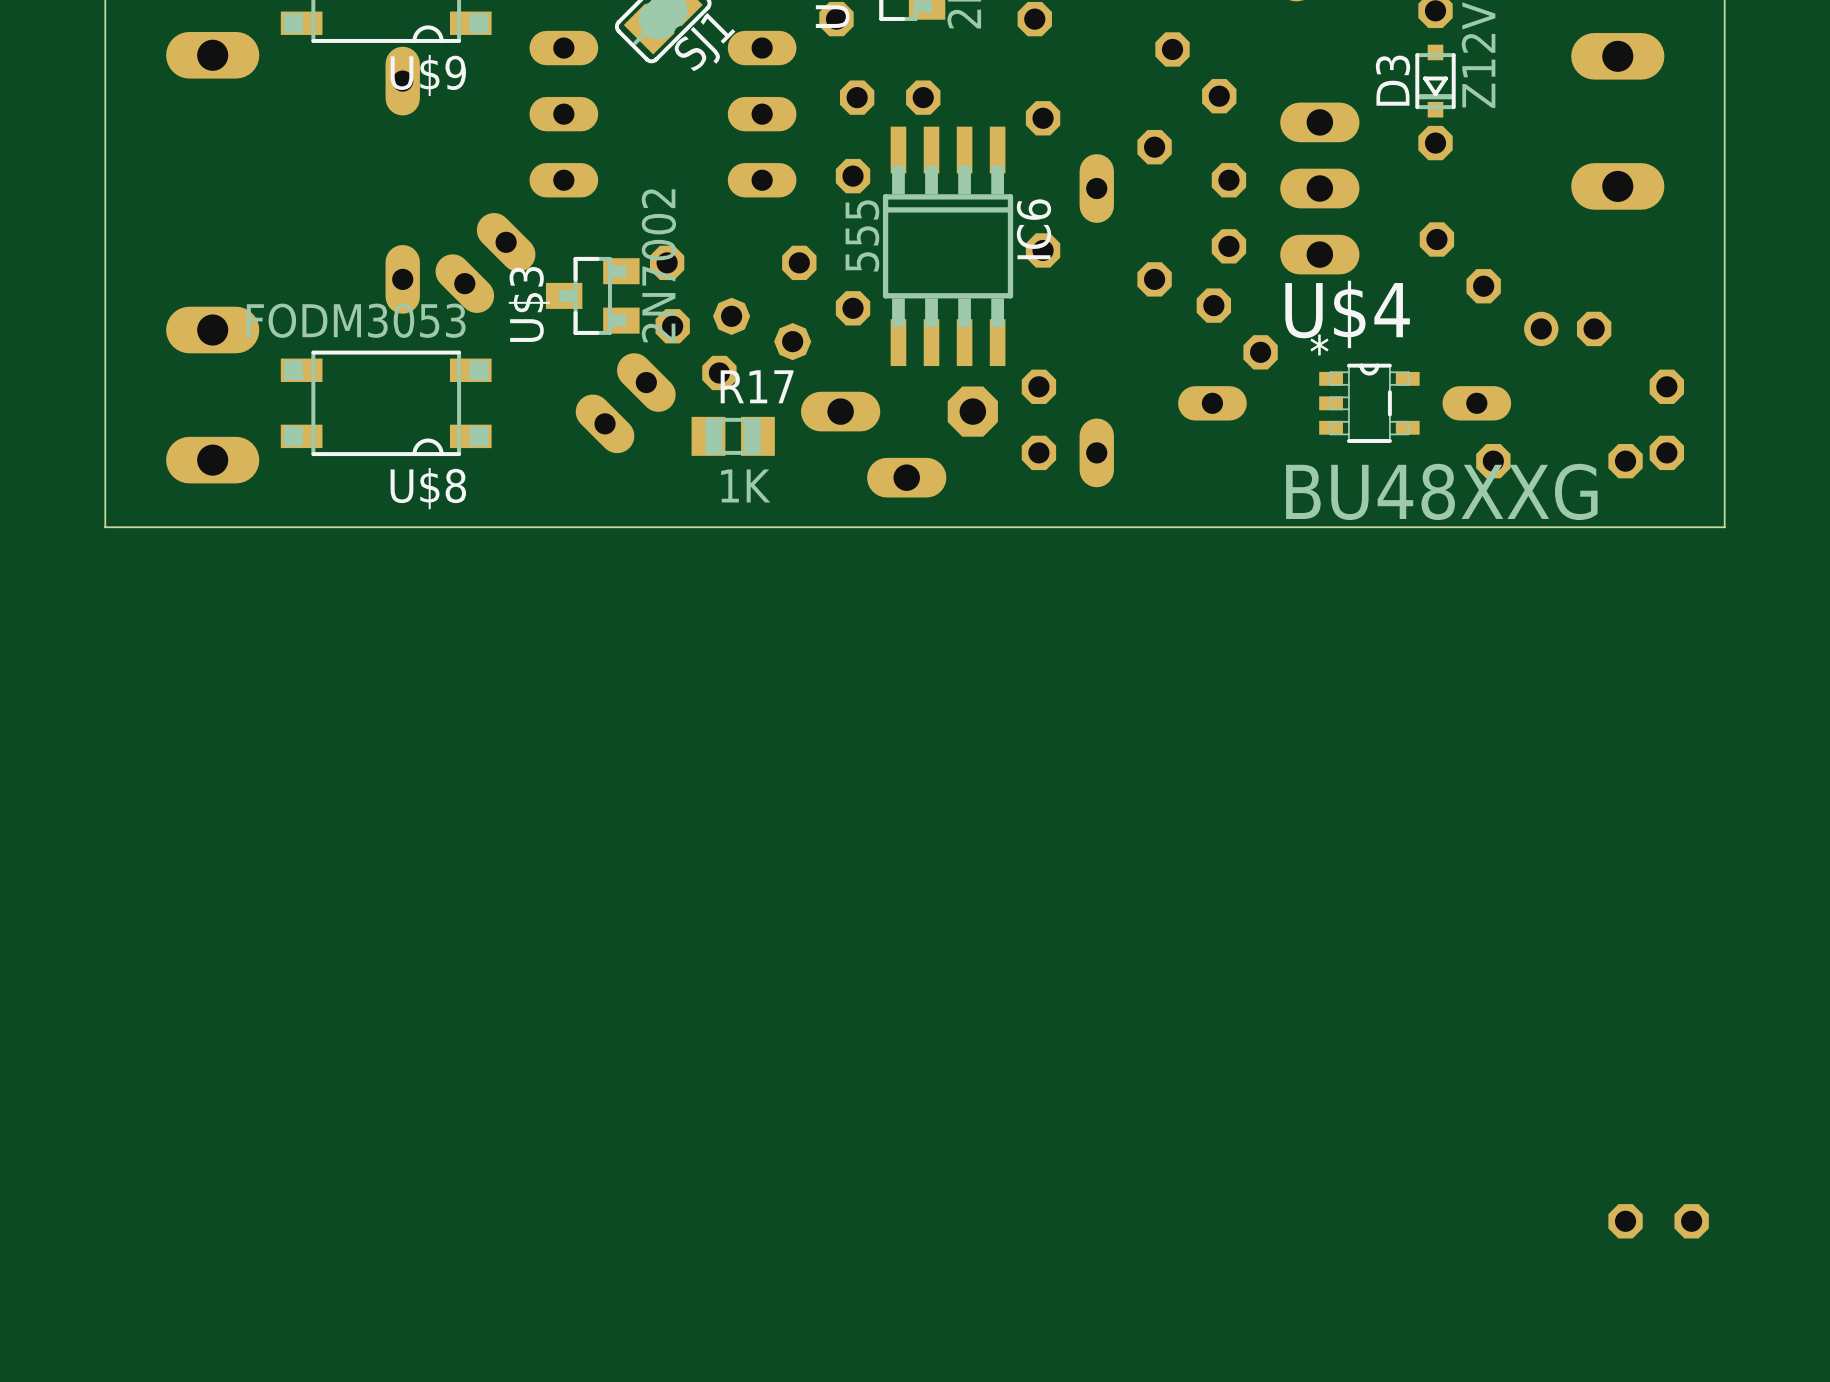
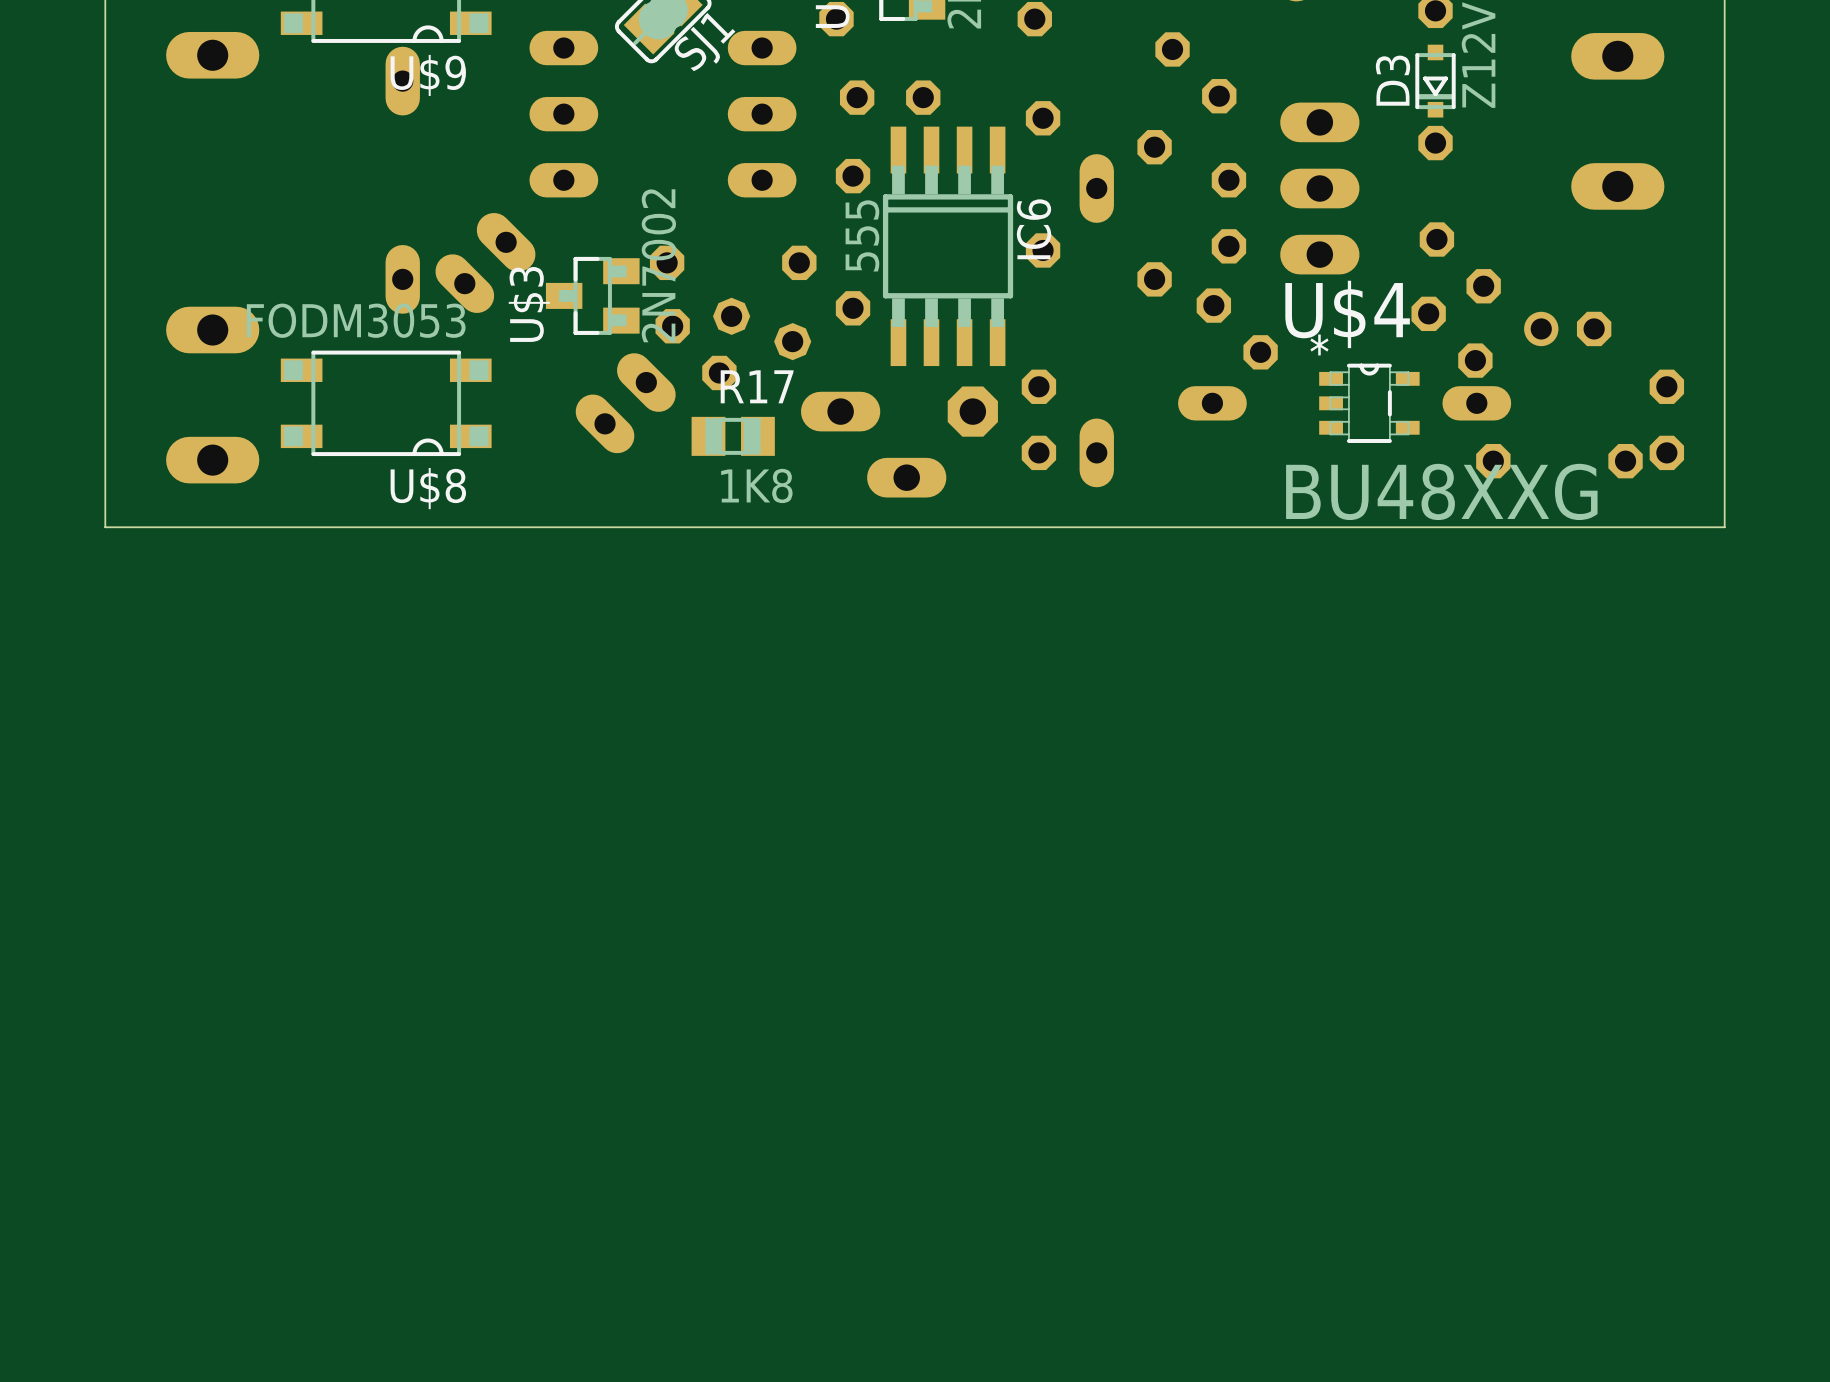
part: none -> (1452, 337)
R17 value: 1K (745, 485) -> 1K8 (756, 485)
part: (1658, 1221) -> none

